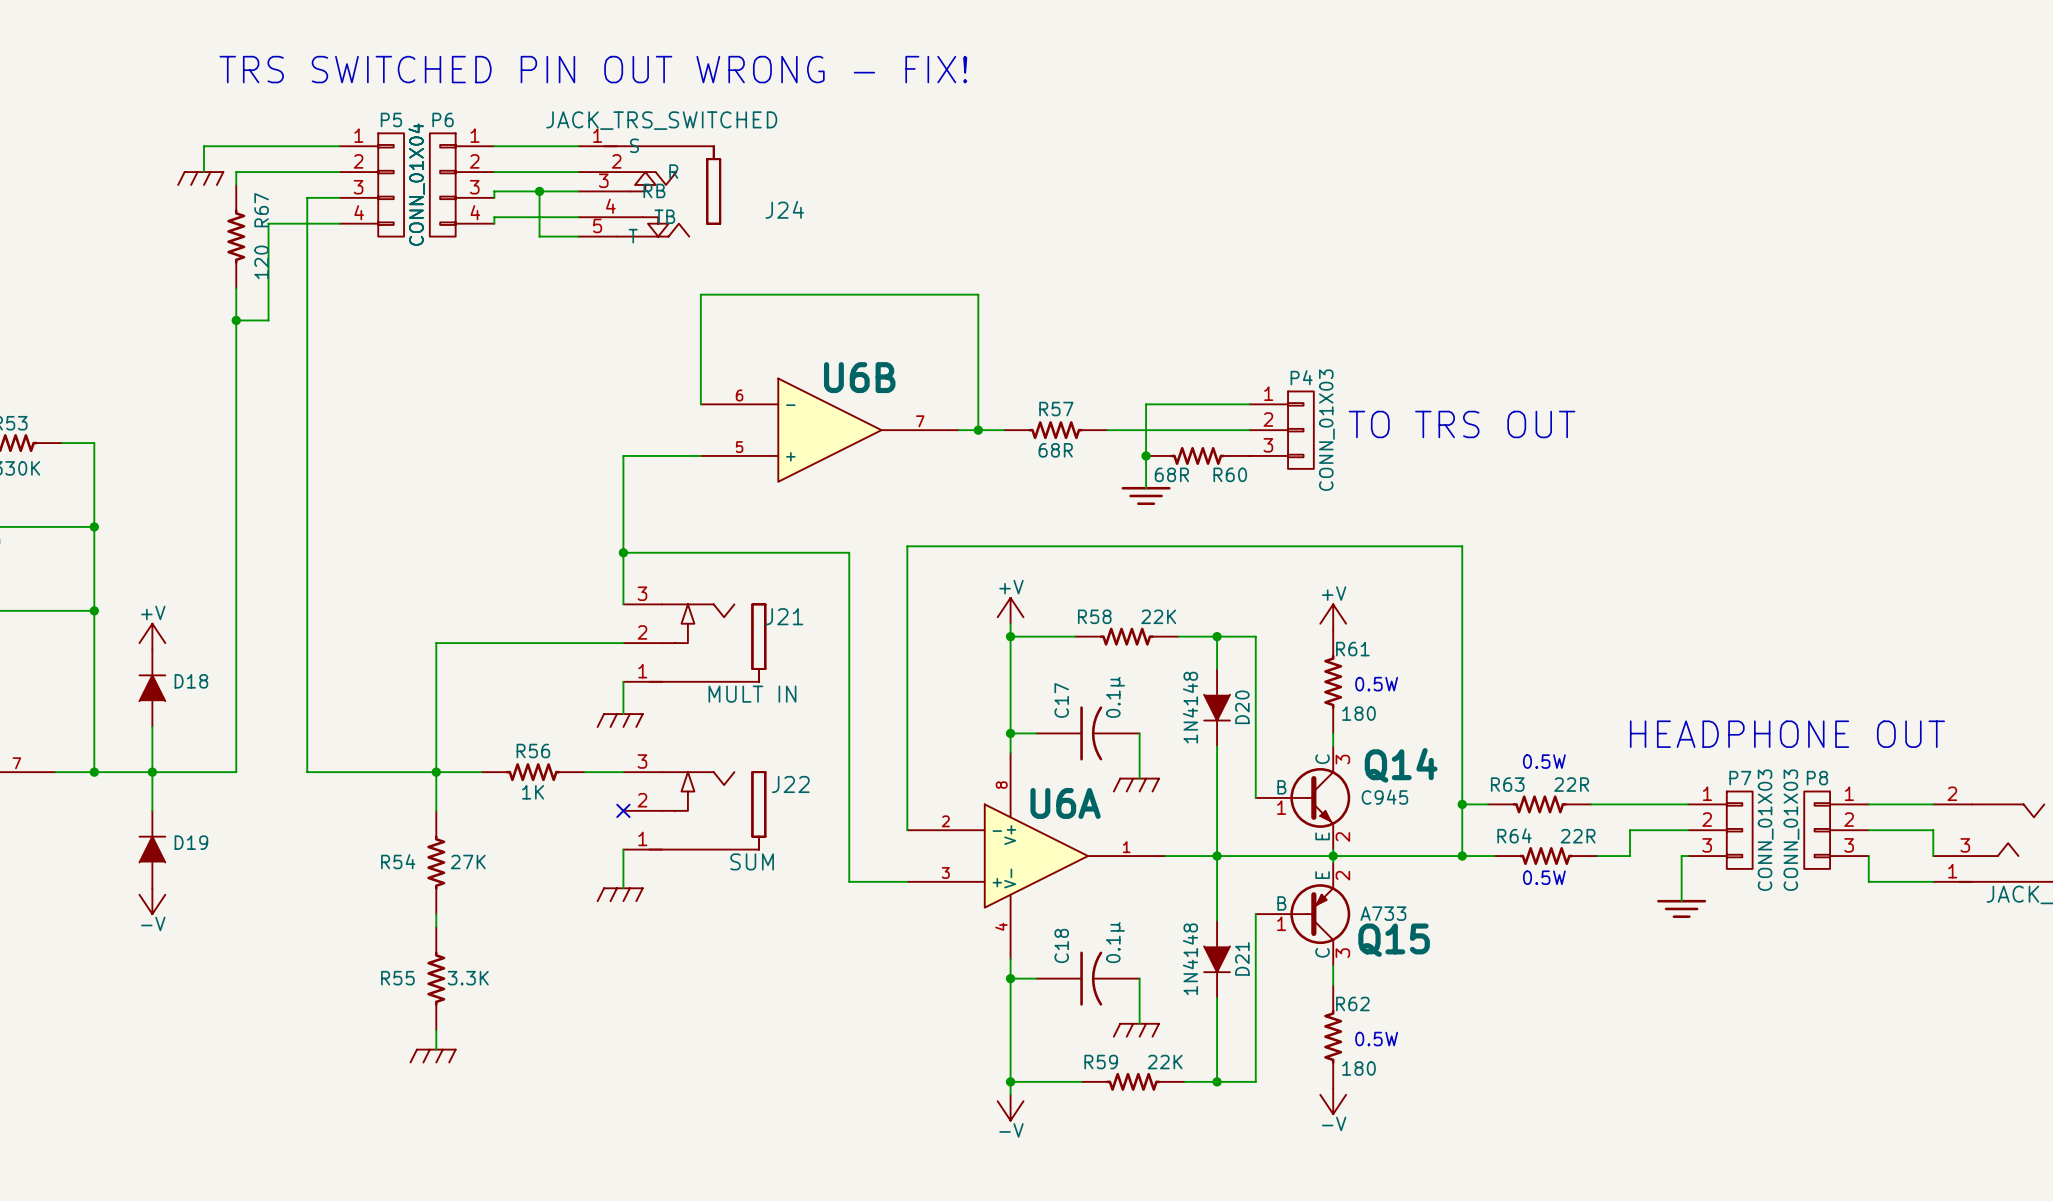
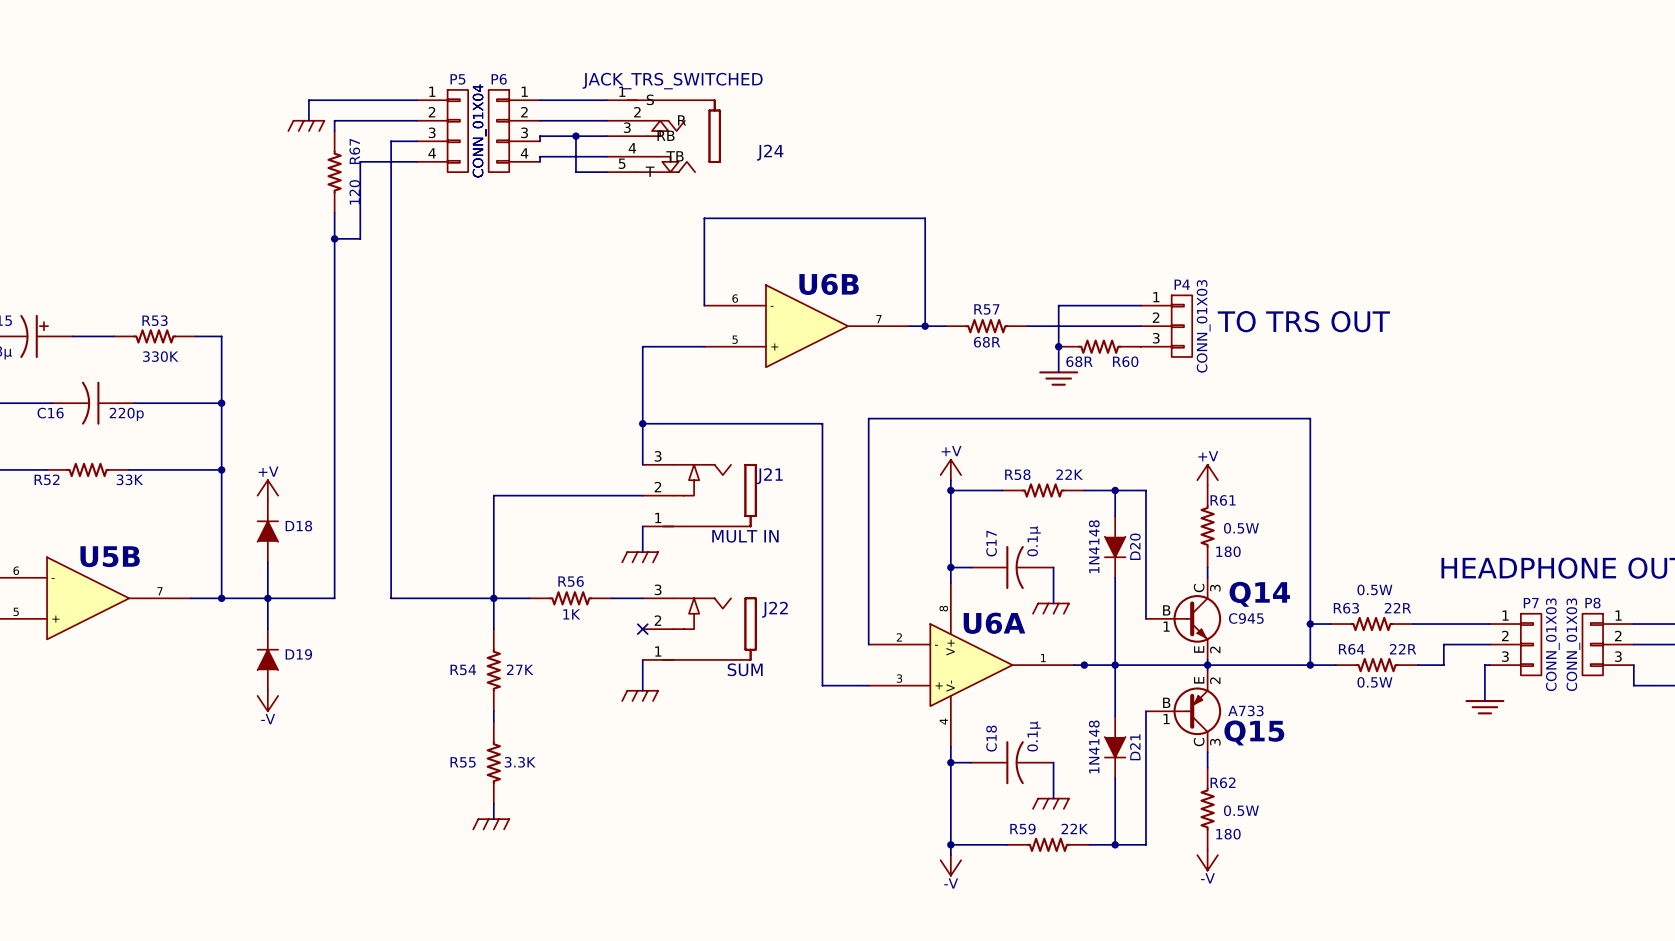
text: TRS SWITCHED PIN OUT WRONG - FIX! (593, 69) -> none
junction: none -> (1084, 665)

